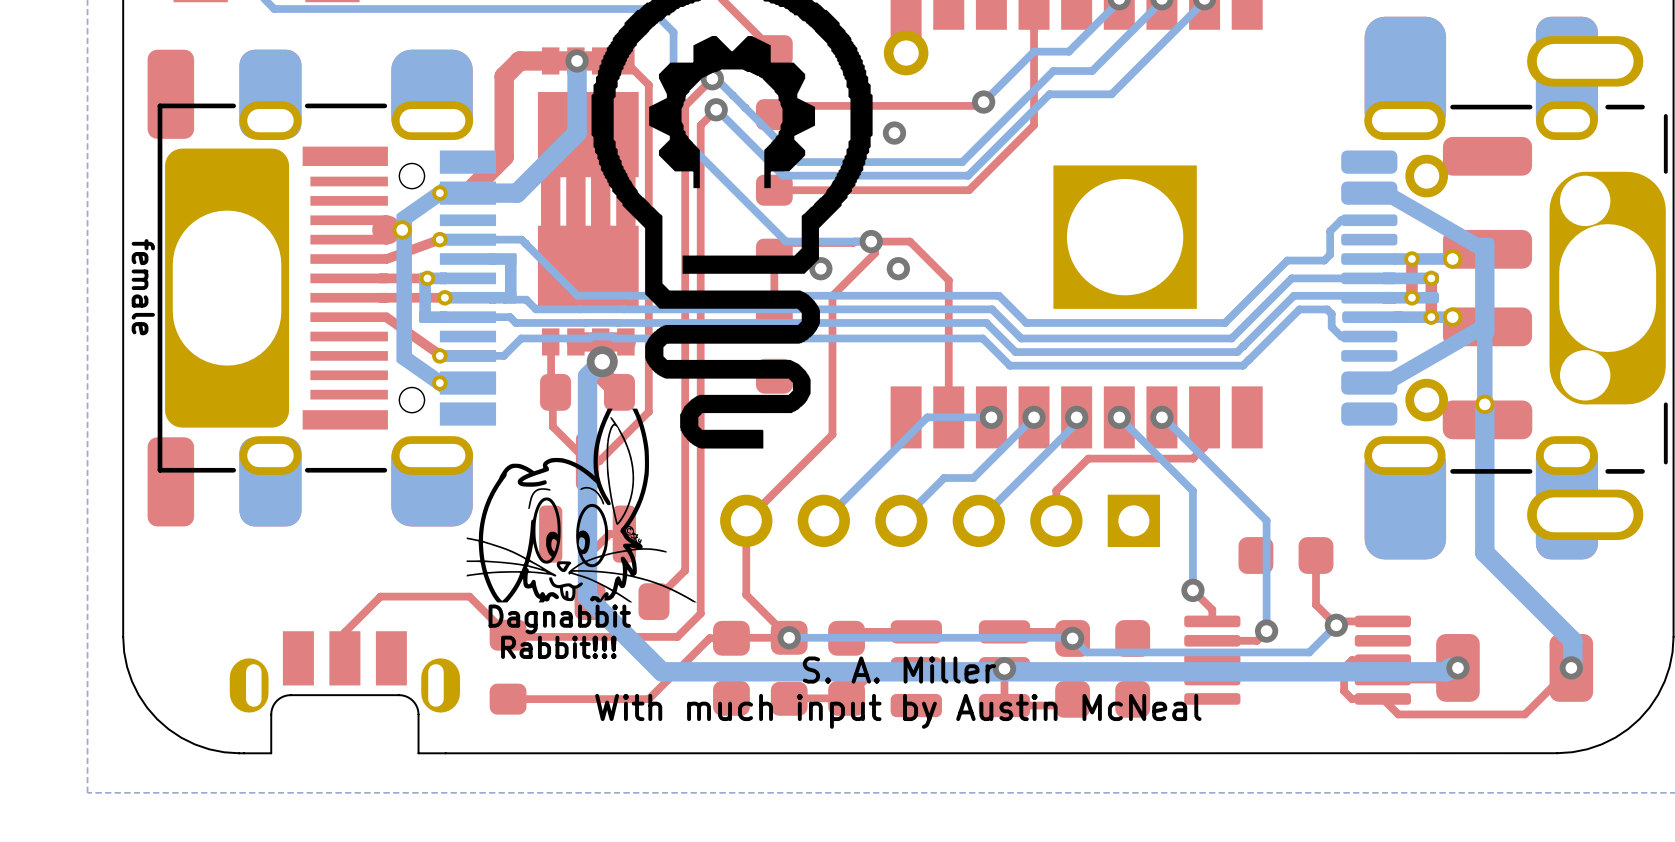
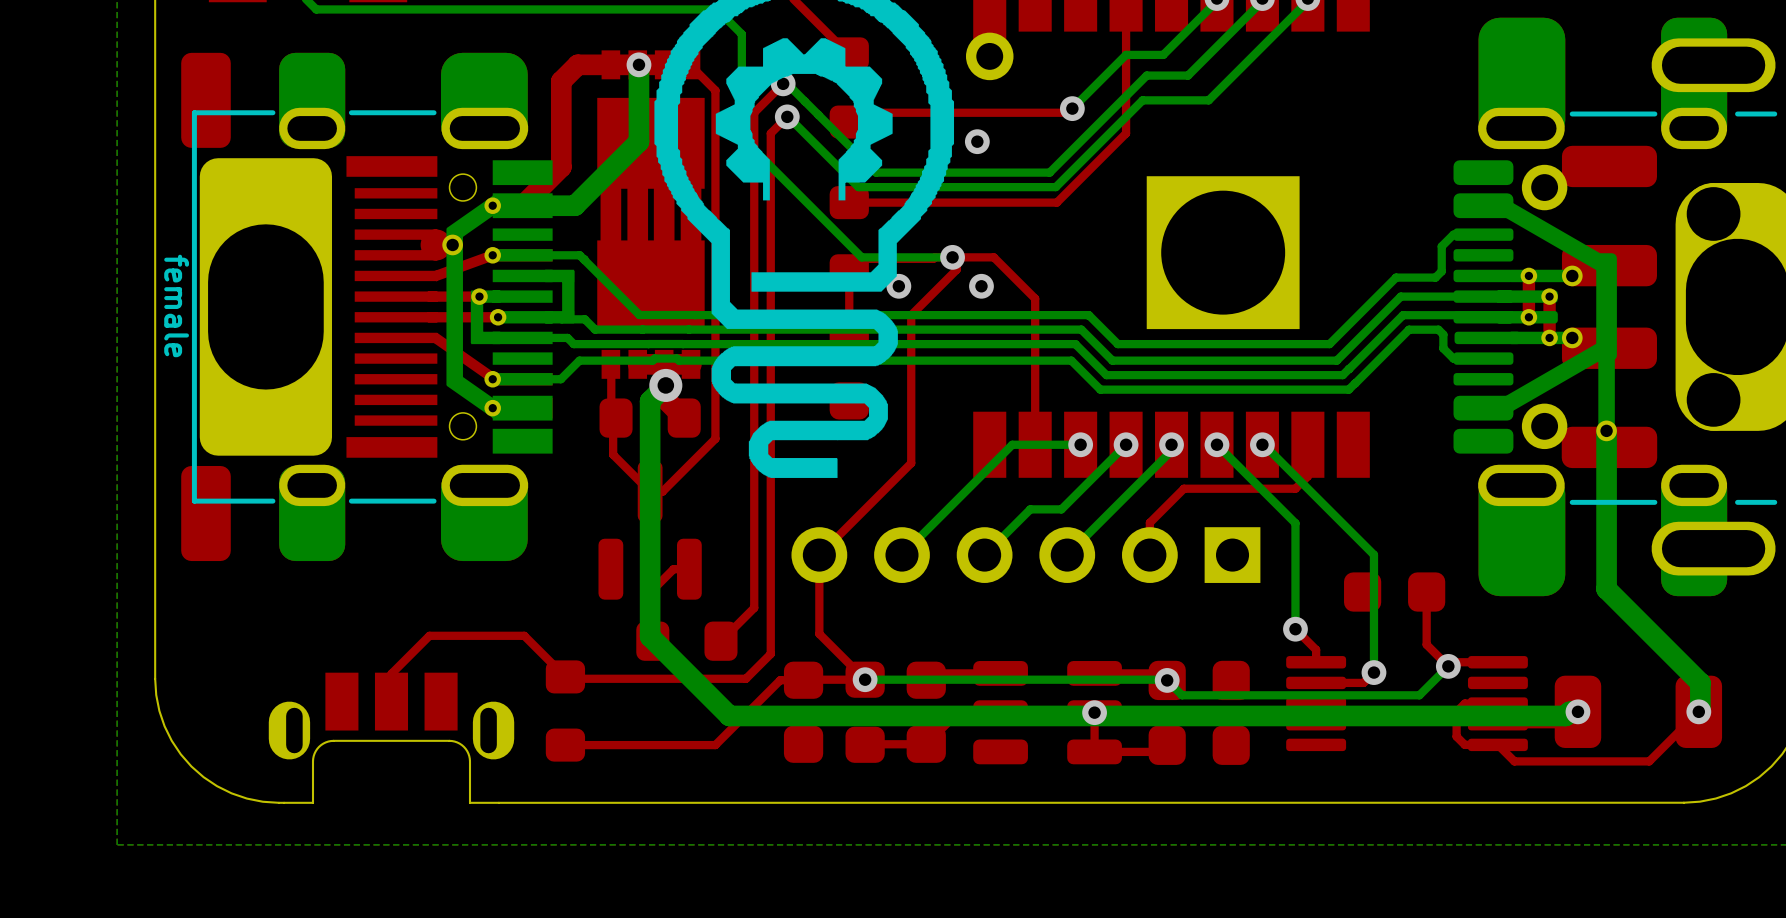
drawing: [466, 408, 697, 603] -> none
text: S. A. Miller (899, 670) -> none
text: With much input by Austin McNeal (898, 711) -> none

